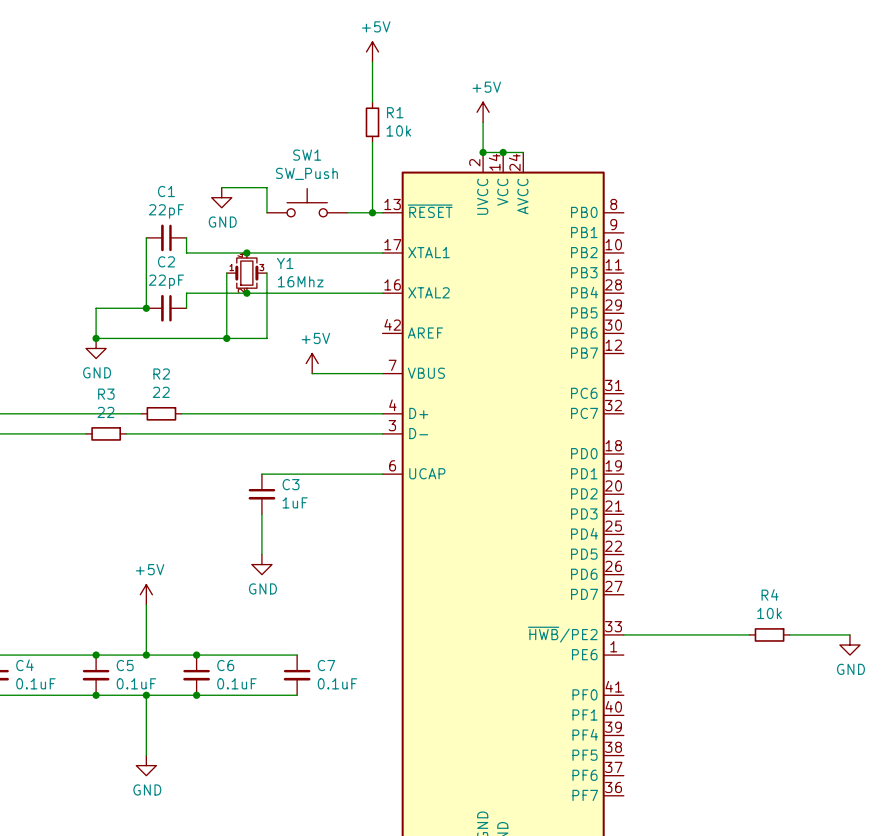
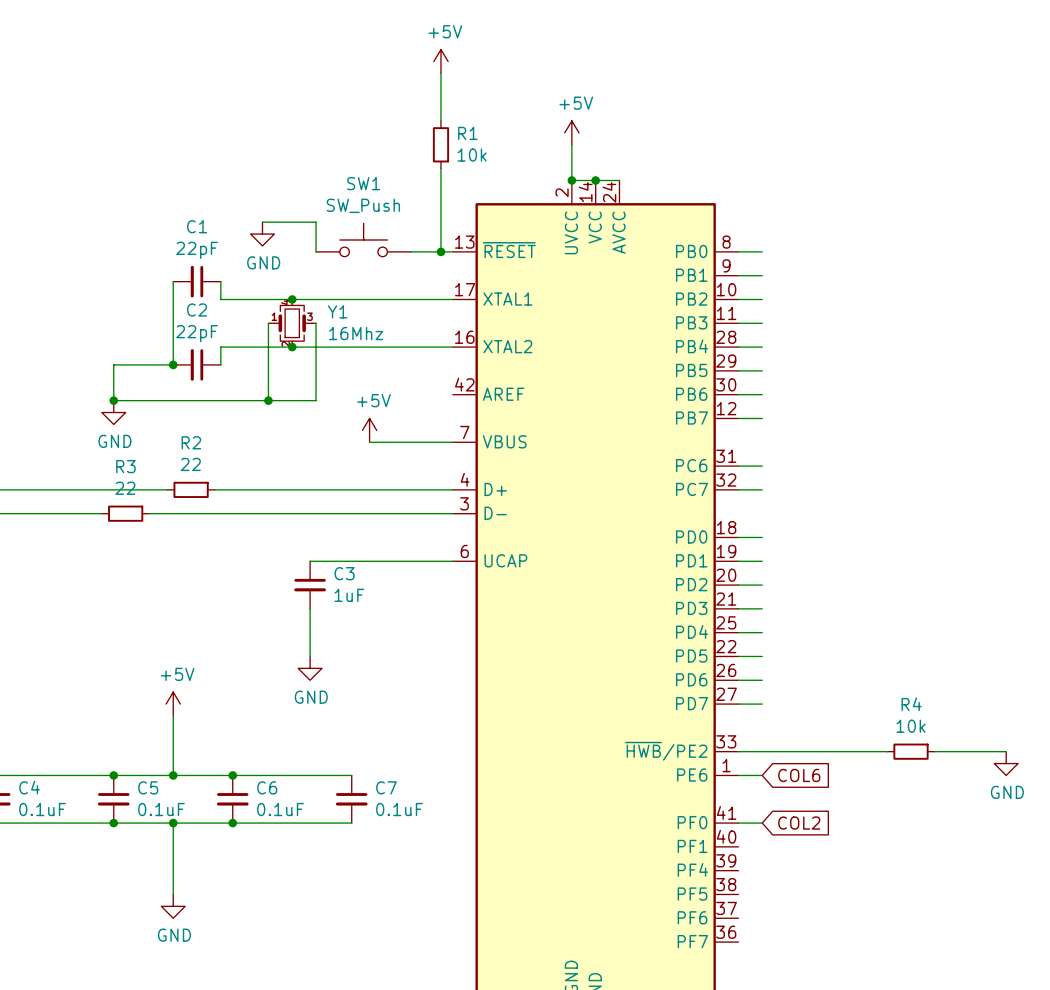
wire: none -> (738, 251) (762, 251)
wire: none -> (738, 275) (762, 275)
wire: none -> (738, 299) (762, 299)
wire: none -> (738, 323) (762, 323)
wire: none -> (738, 347) (762, 347)
wire: none -> (738, 370) (762, 370)
wire: none -> (738, 394) (762, 394)
wire: none -> (738, 418) (762, 418)
wire: none -> (738, 466) (762, 466)
wire: none -> (738, 489) (762, 489)
wire: none -> (738, 537) (762, 537)
wire: none -> (738, 561) (762, 561)
wire: none -> (738, 585) (762, 585)
wire: none -> (738, 608) (762, 608)
wire: none -> (738, 632) (762, 632)
wire: none -> (738, 656) (762, 656)
wire: none -> (738, 680) (762, 680)
wire: none -> (738, 704) (762, 704)
wire: none -> (738, 775) (762, 775)
global label: none -> COL6 (799, 775)
wire: none -> (738, 823) (762, 823)
global label: none -> COL2 (799, 823)

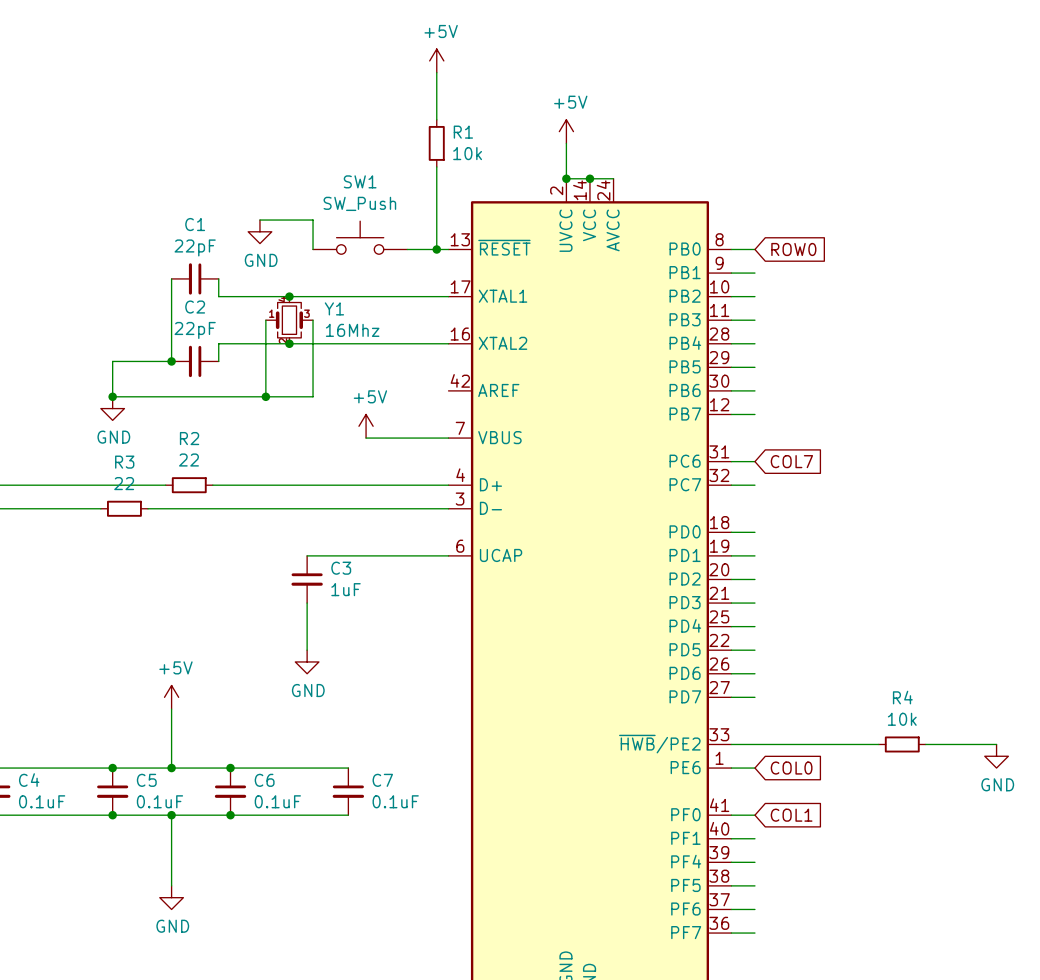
global label: none -> ROW0 (793, 249)
global label: none -> COL7 (791, 461)
global label: COL6 (799, 775) -> COL0 (791, 768)
global label: COL2 (799, 823) -> COL1 (791, 815)
wire: none -> (731, 838) (754, 838)
wire: none -> (731, 862) (754, 862)
wire: none -> (731, 885) (754, 885)
wire: none -> (731, 909) (754, 909)
wire: none -> (731, 933) (754, 933)

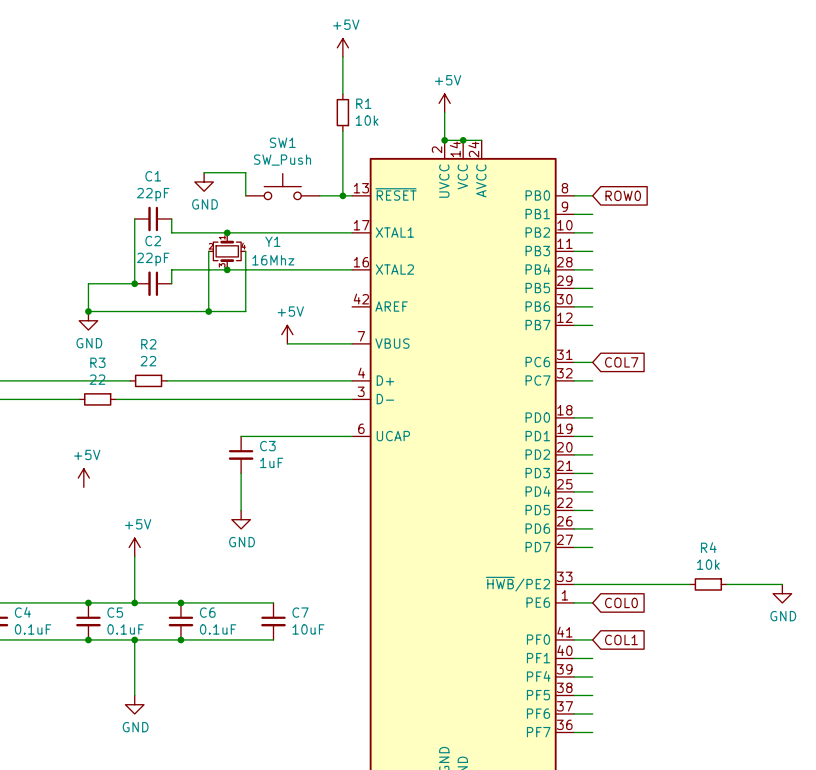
Y1 rotation: 0° (289, 320) -> 90° clockwise (227, 251)
power symbol: none -> +5V (83, 478)
C7 value: 0.1uF (395, 801) -> 10uF (308, 629)

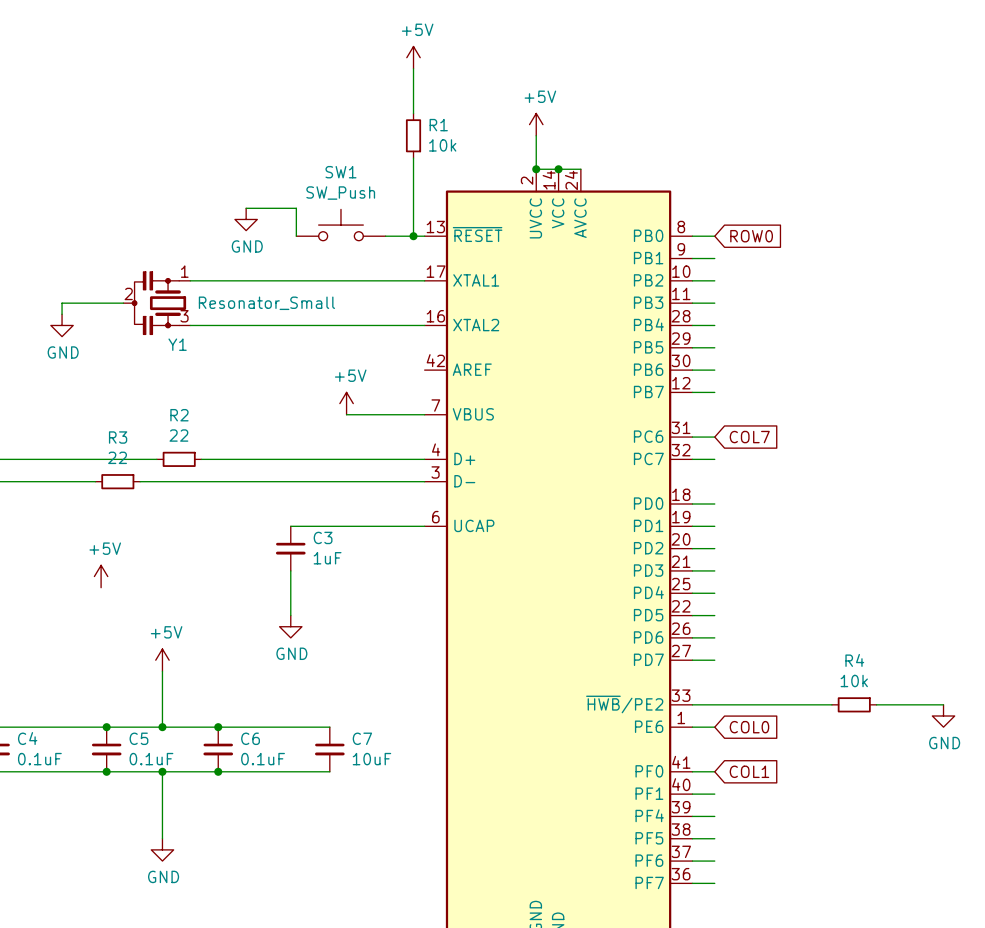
wire: (134, 218) (134, 283) (88, 283) (88, 311) (245, 311) (245, 251) -> none
C1: 22pF (153, 218) -> none
wire: (171, 218) (171, 232) -> (190, 280) (207, 280)
Y1 symbol: [208, 232, 246, 270] -> [123, 271, 191, 335]
junction: (227, 232) -> none
Y1 name position: Y1 (272, 241) -> Y1 (177, 344)
wire: none -> (123, 303) (62, 303) (62, 314)
wire: (208, 251) (208, 311) -> none
Y1 value: 16Mhz (273, 260) -> Resonator_Small (266, 303)
wire: (171, 269) (171, 283) -> (207, 325) (190, 325)
junction: (227, 269) -> none
junction: (134, 283) -> none
C2: 22pF (153, 283) -> none
junction: (88, 311) -> none
junction: (208, 311) -> none
power symbol position: GND (88, 320) -> GND (62, 325)

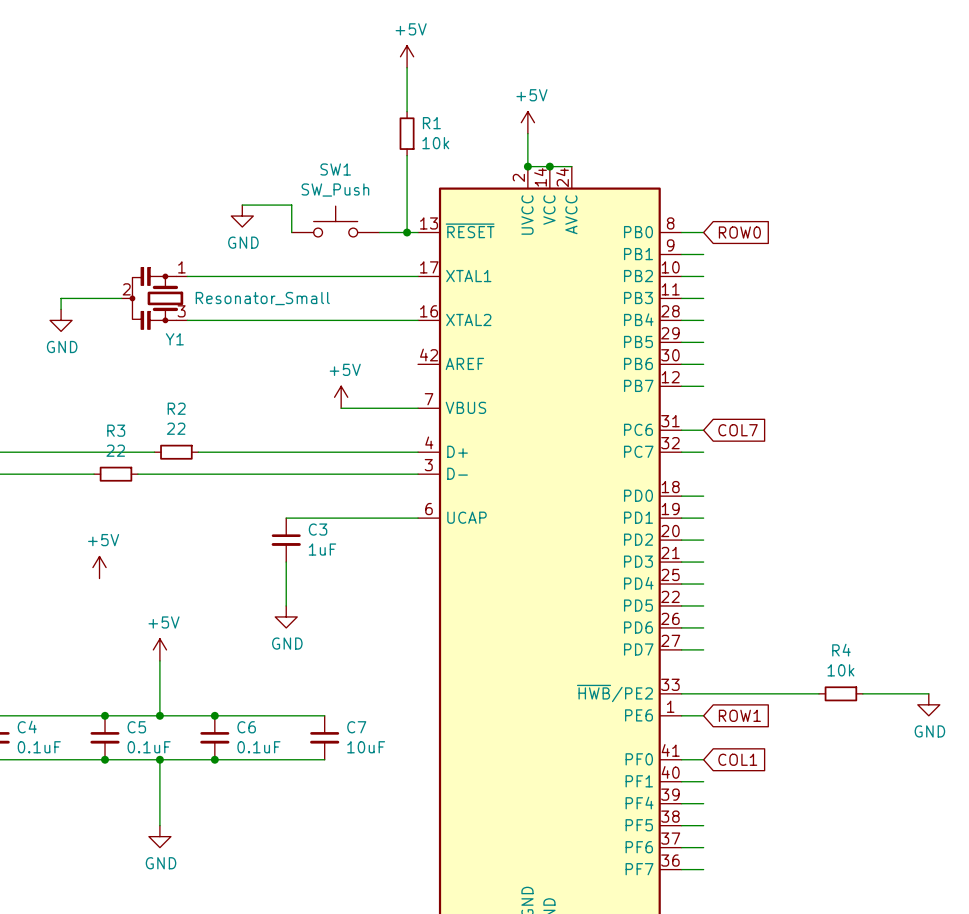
global label: COL0 (749, 727) -> ROW1 (739, 715)

